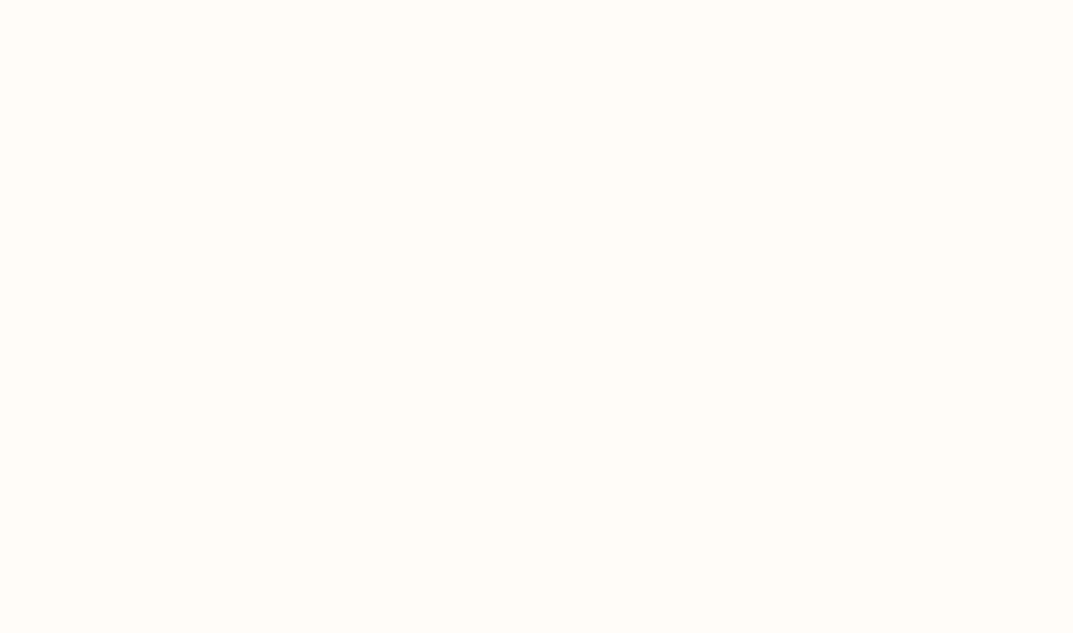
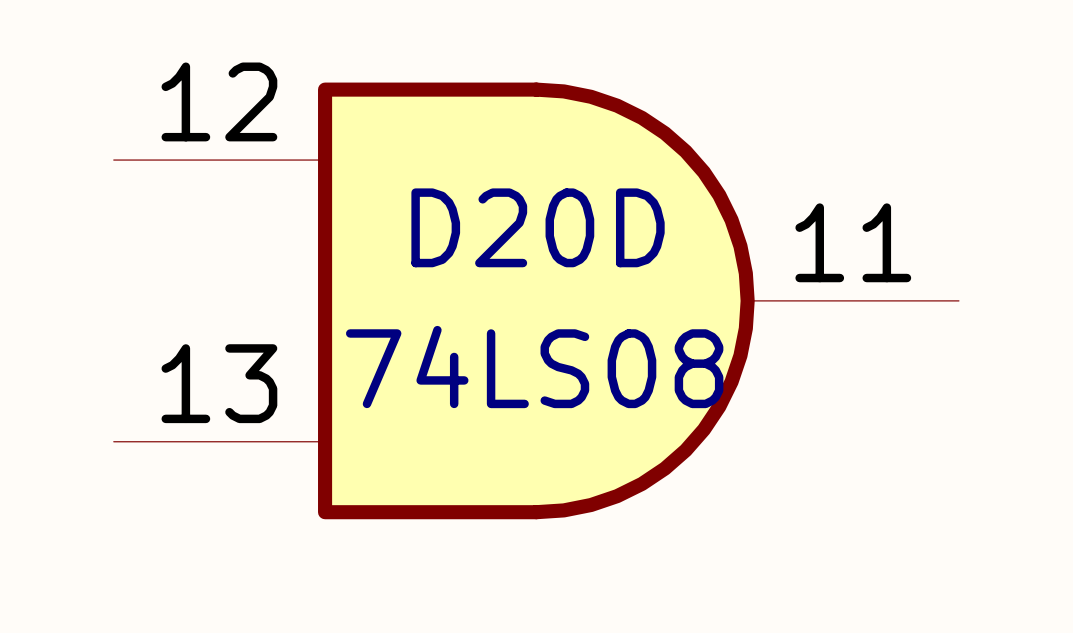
D20D: none -> 74LS08 (536, 300)

